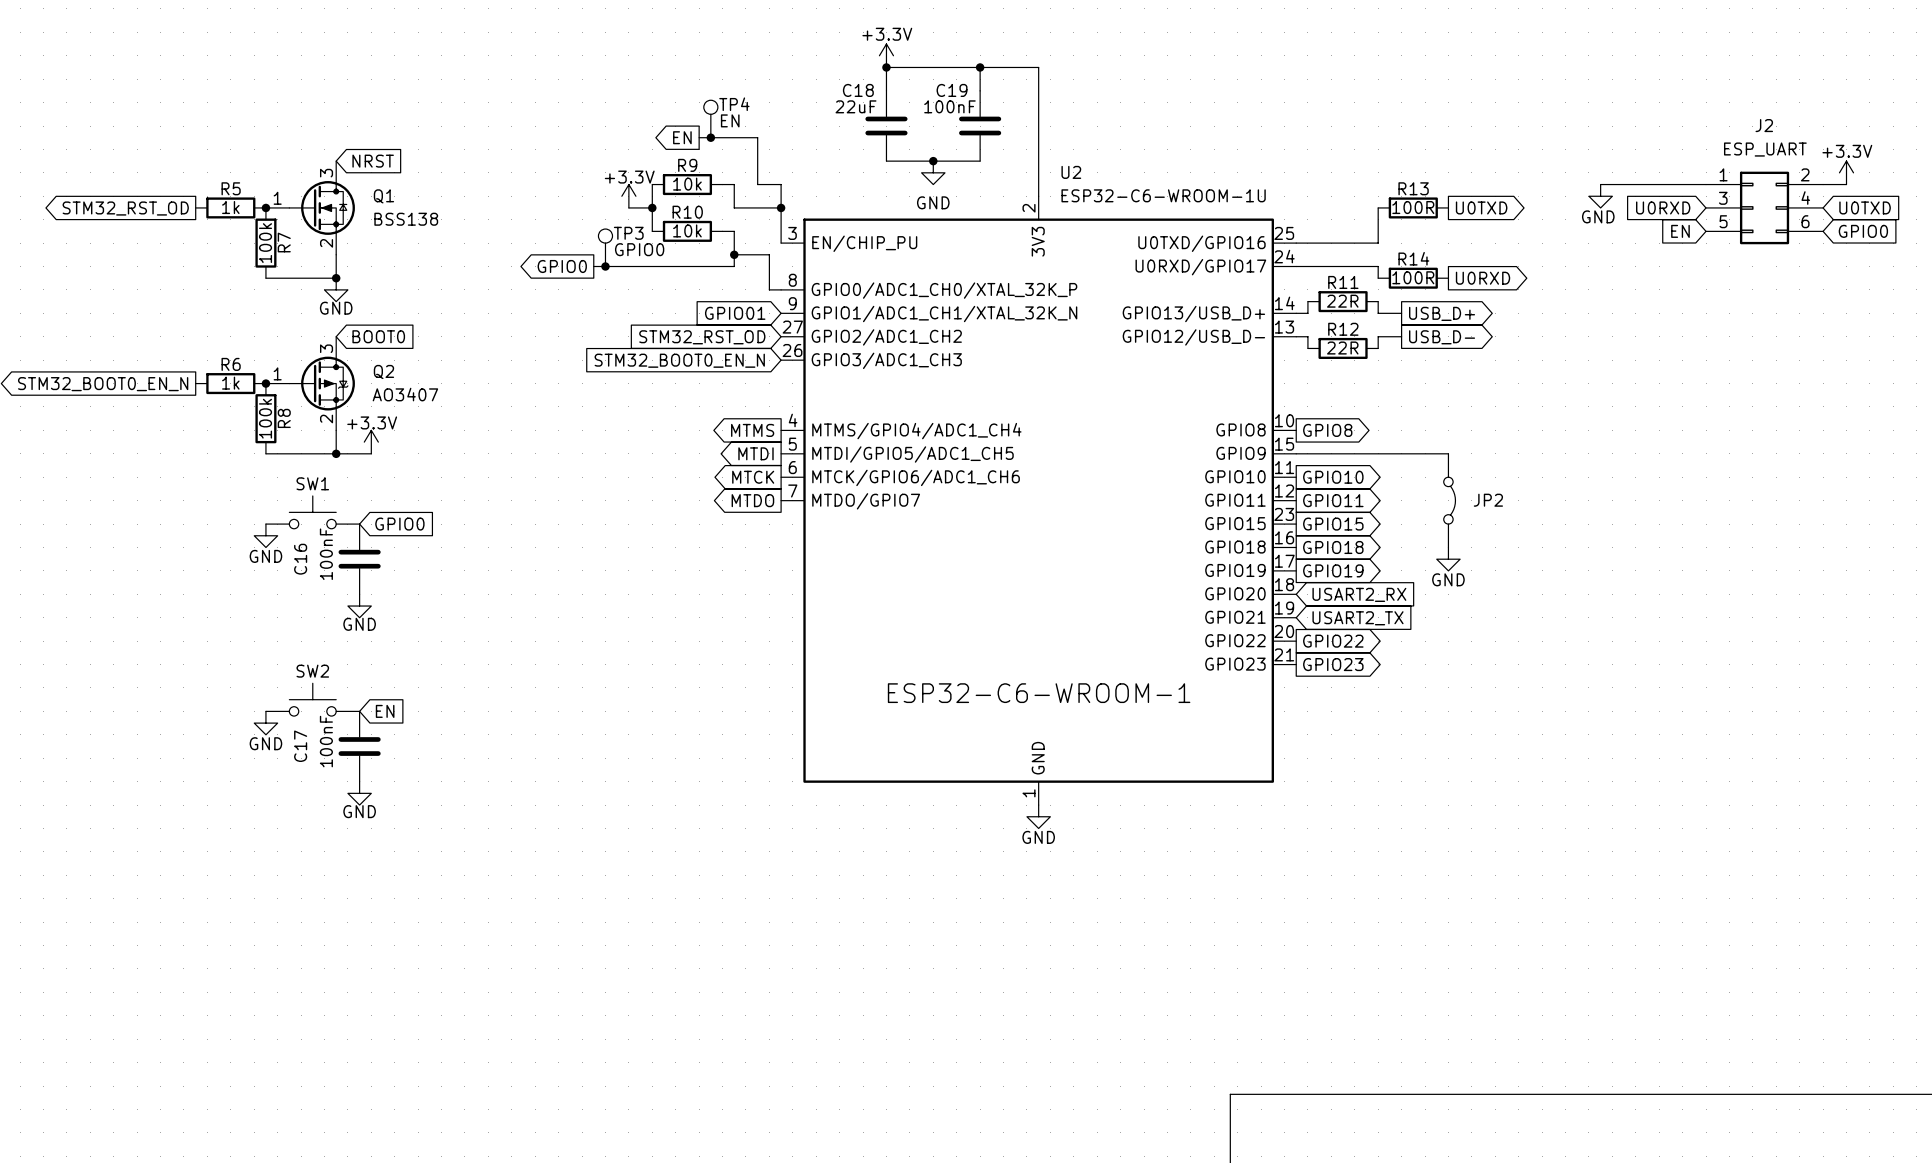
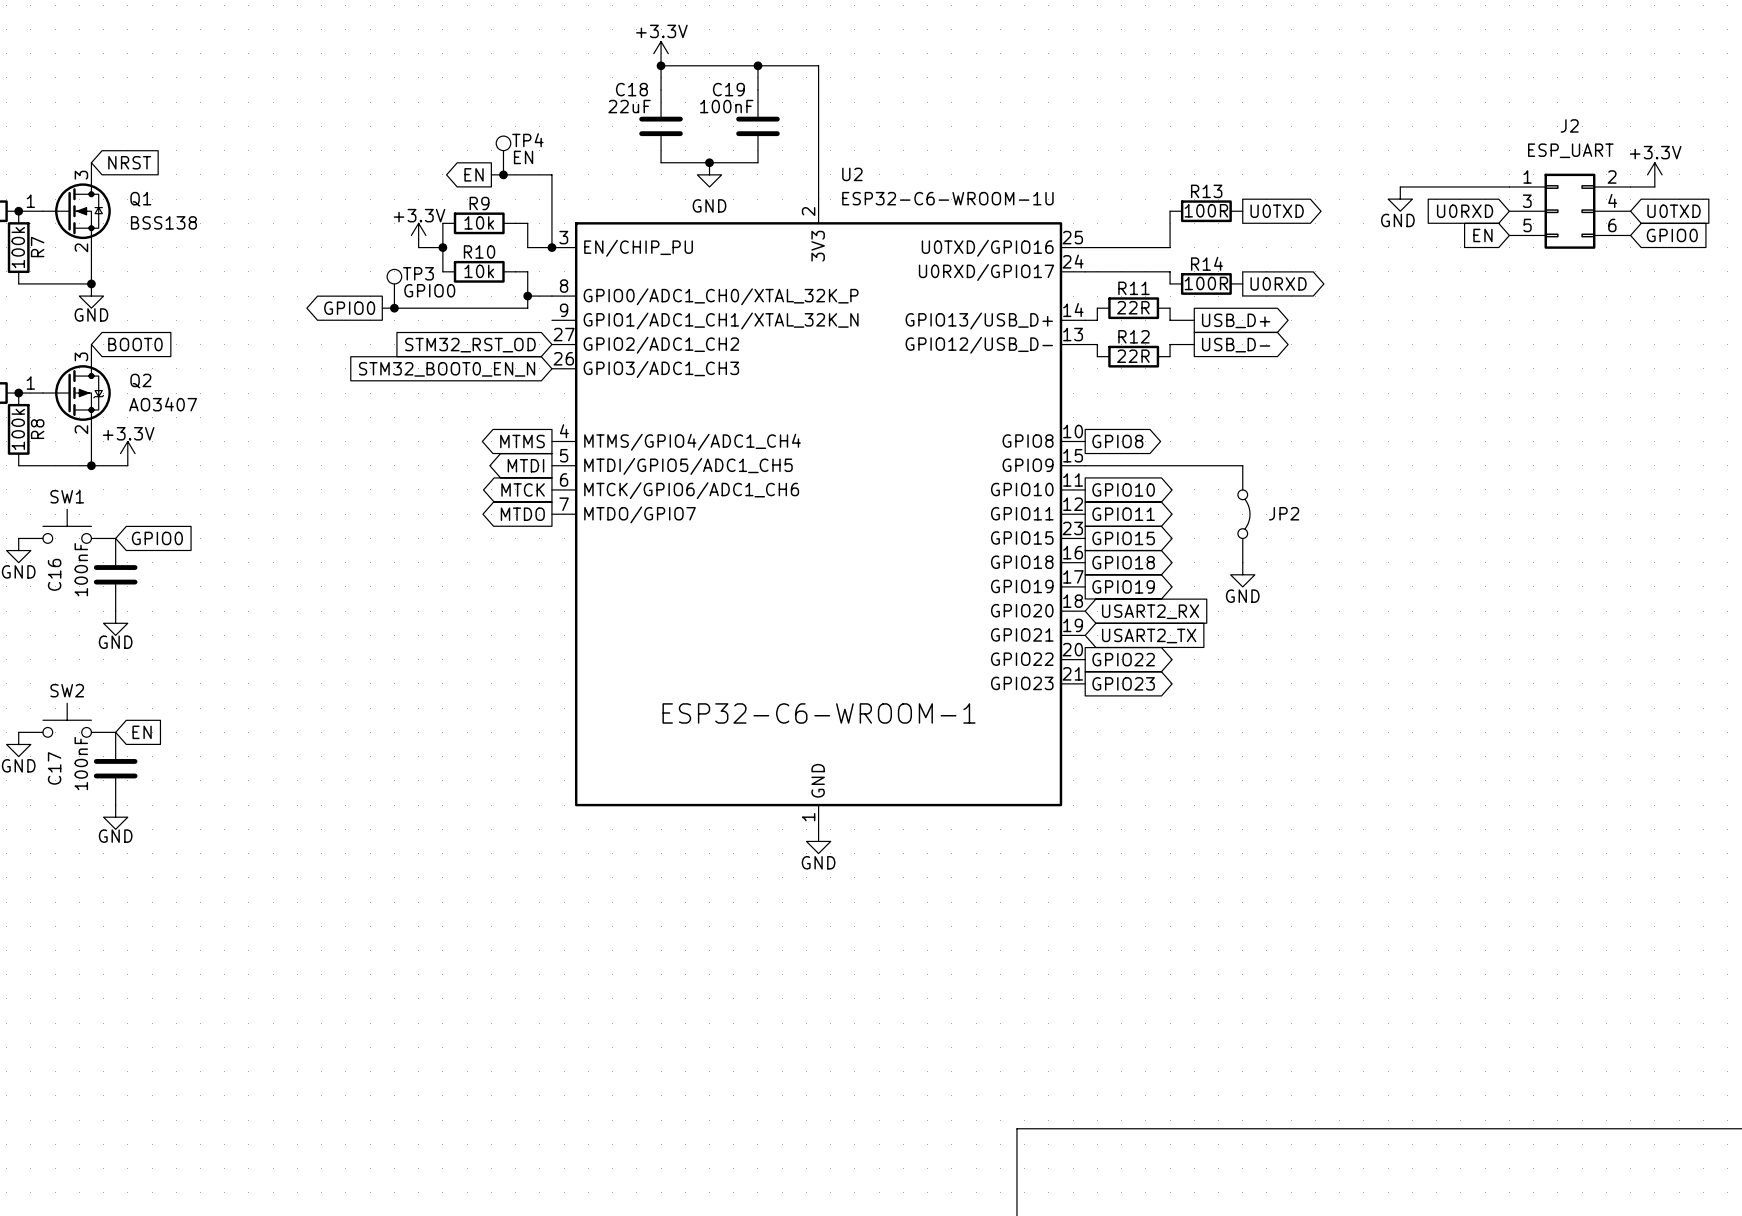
TP4 position: (710, 118) -> (503, 155)
global label position: EN (682, 137) -> EN (474, 174)
wire: (699, 137) (757, 137) (757, 184) (781, 184) -> (491, 174) (551, 174) (551, 186)
junction: (710, 137) -> none
junction: none -> (503, 174)
wire: (652, 184) (652, 231) -> (442, 223) (442, 271)
R9 position: (687, 184) -> (479, 223)
wire: (722, 184) (734, 184) (734, 207) (781, 207) -> none
power symbol position: +3.3V (628, 196) -> +3.3V (418, 235)
wire: (628, 207) (652, 207) -> (418, 247) (442, 247)
junction: (652, 207) -> none
junction: (781, 207) -> none
wire: none -> (515, 223) (527, 223) (527, 247) (551, 247)
R10 position: (687, 231) -> (479, 271)
wire: (722, 231) (734, 231) (734, 266) (593, 266) -> (515, 271) (527, 271) (527, 308) (382, 308)
junction: none -> (442, 247)
junction: none -> (551, 247)
TP3 position: (605, 247) -> (394, 288)
wire: (734, 254) (769, 254) (769, 289) -> (527, 296) (539, 296)
junction: (734, 254) -> none
global label position: GPIO0 (562, 266) -> GPIO0 (349, 308)
junction: (605, 266) -> none
junction: none -> (527, 296)
junction: none -> (394, 308)
global label: GPIO01 (735, 313) -> none

